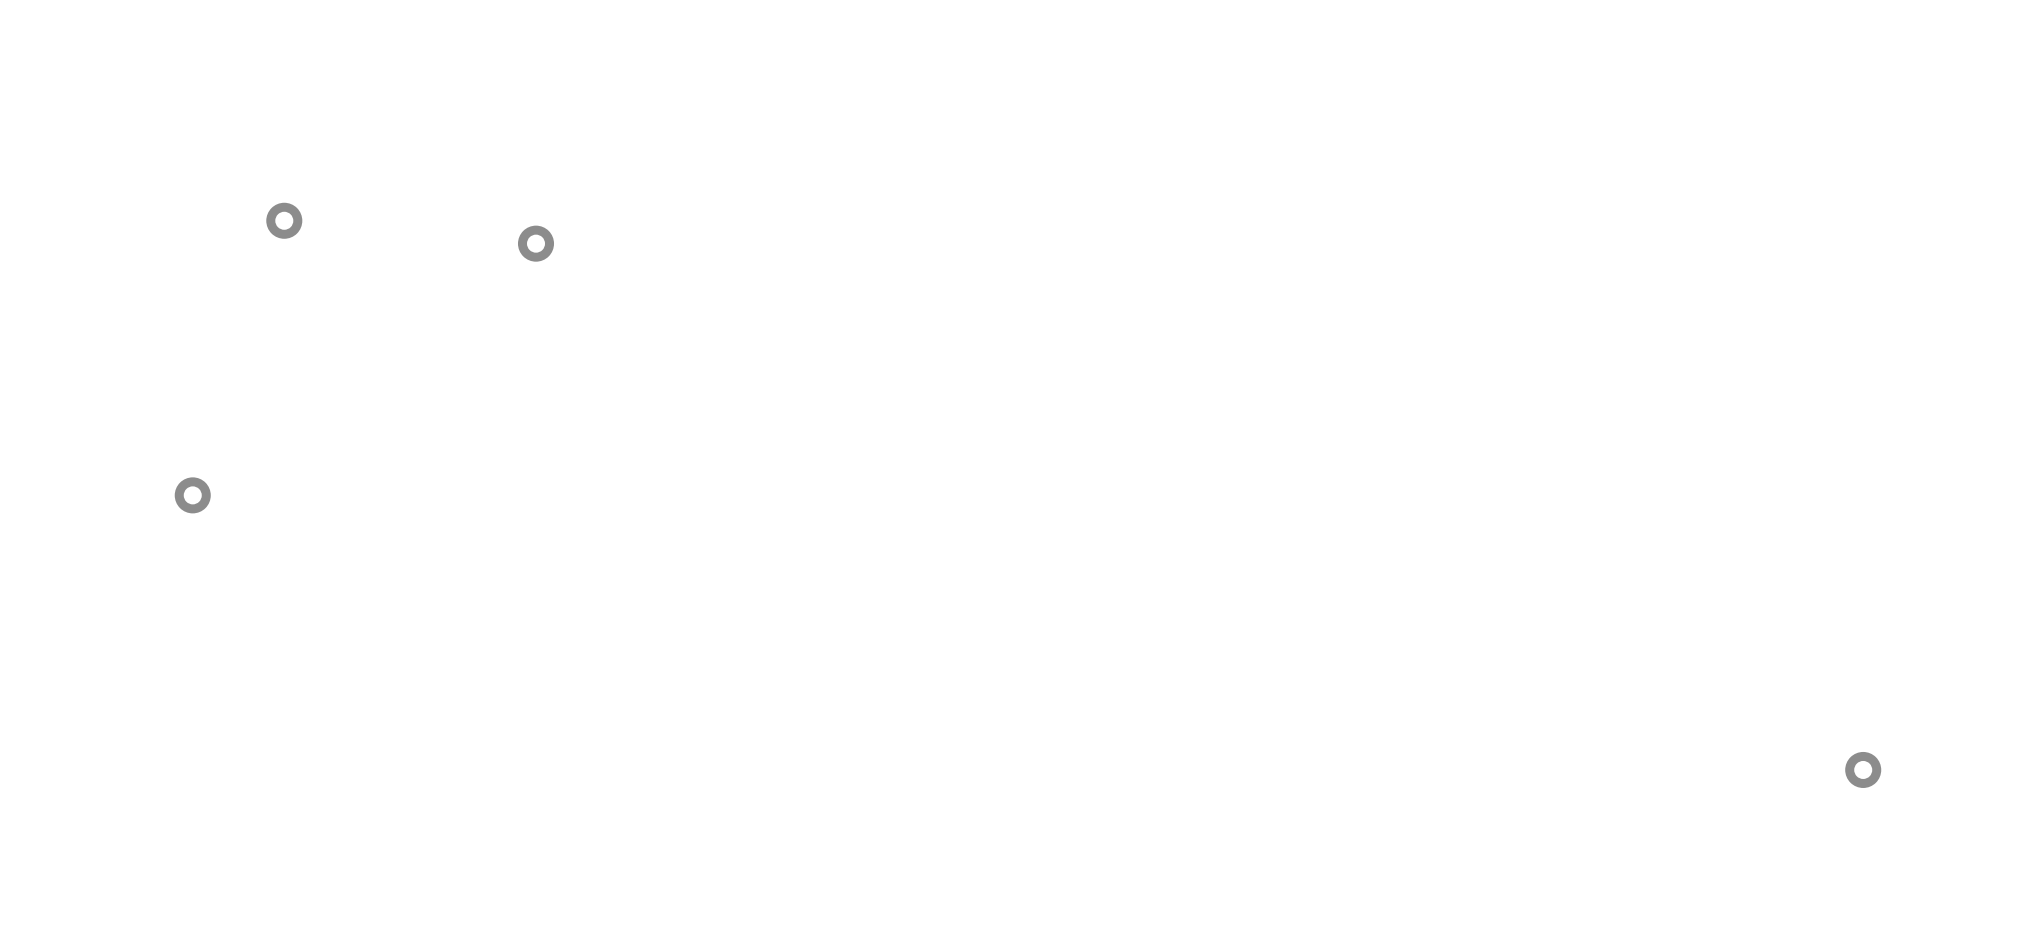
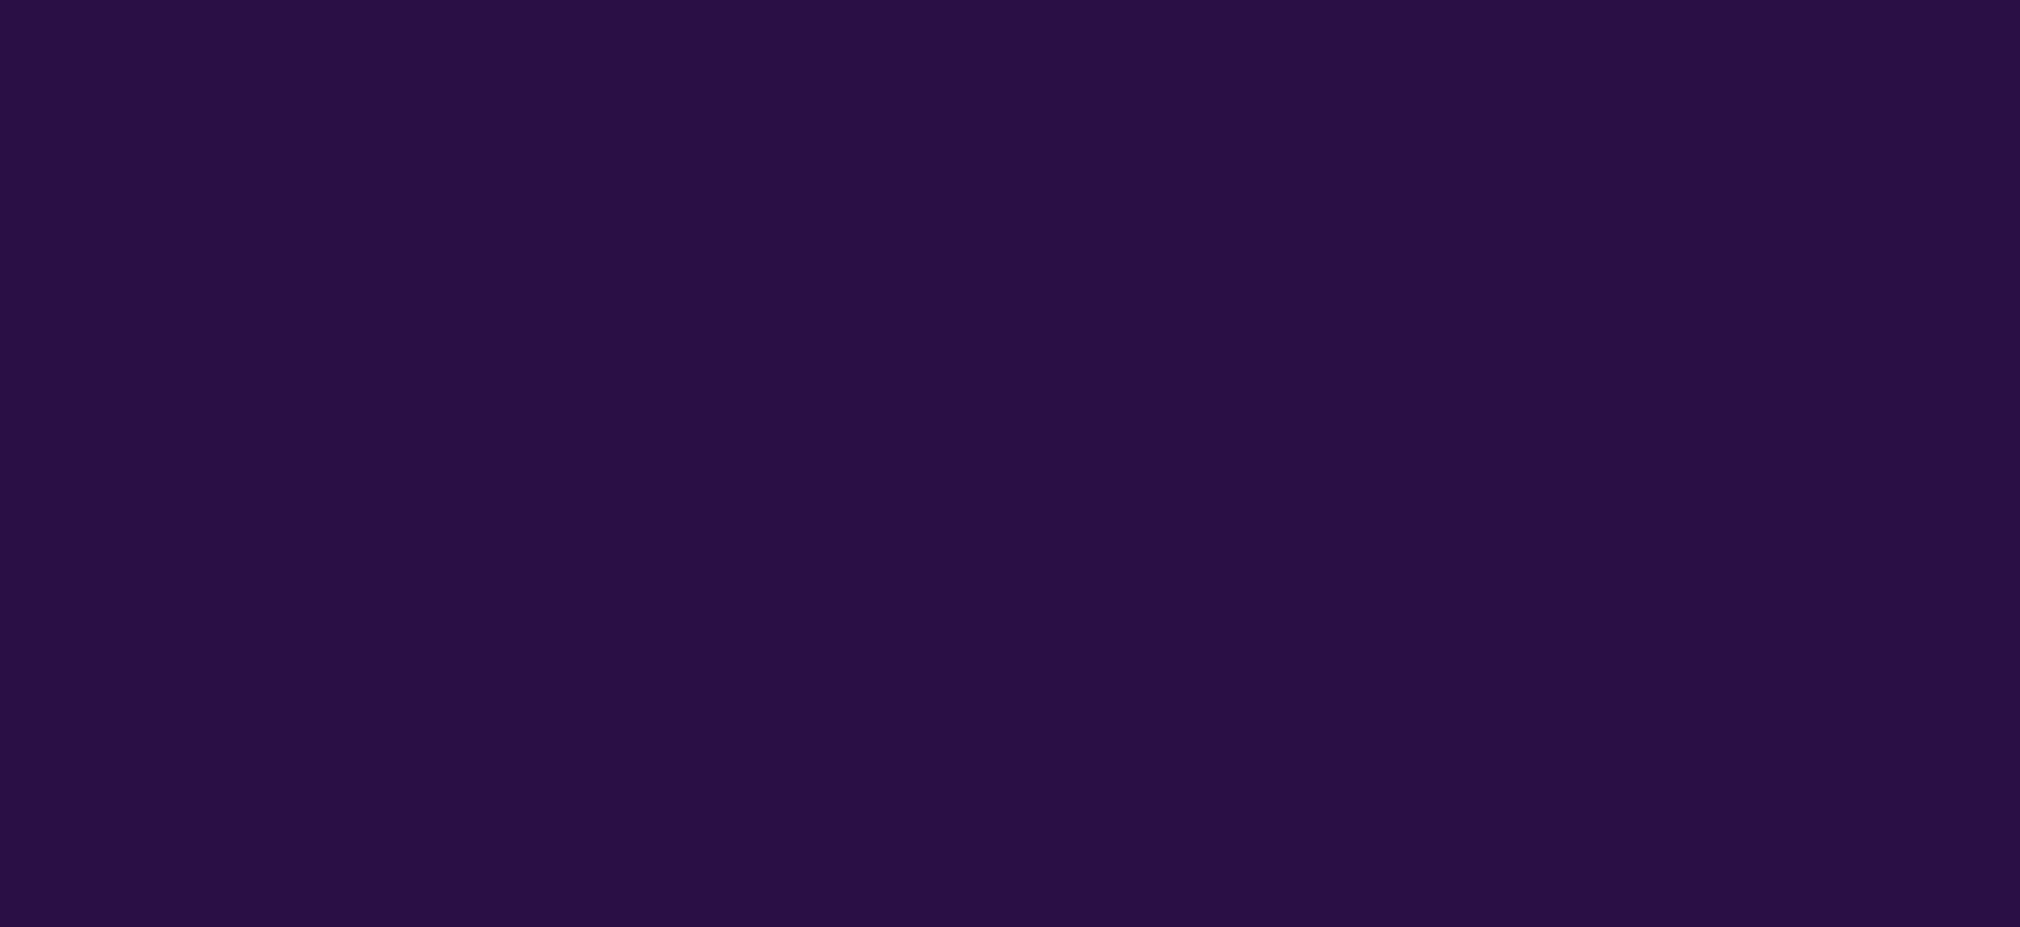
part: (284, 220) -> none
part: (536, 243) -> none
part: (192, 495) -> none
part: (1863, 769) -> none

